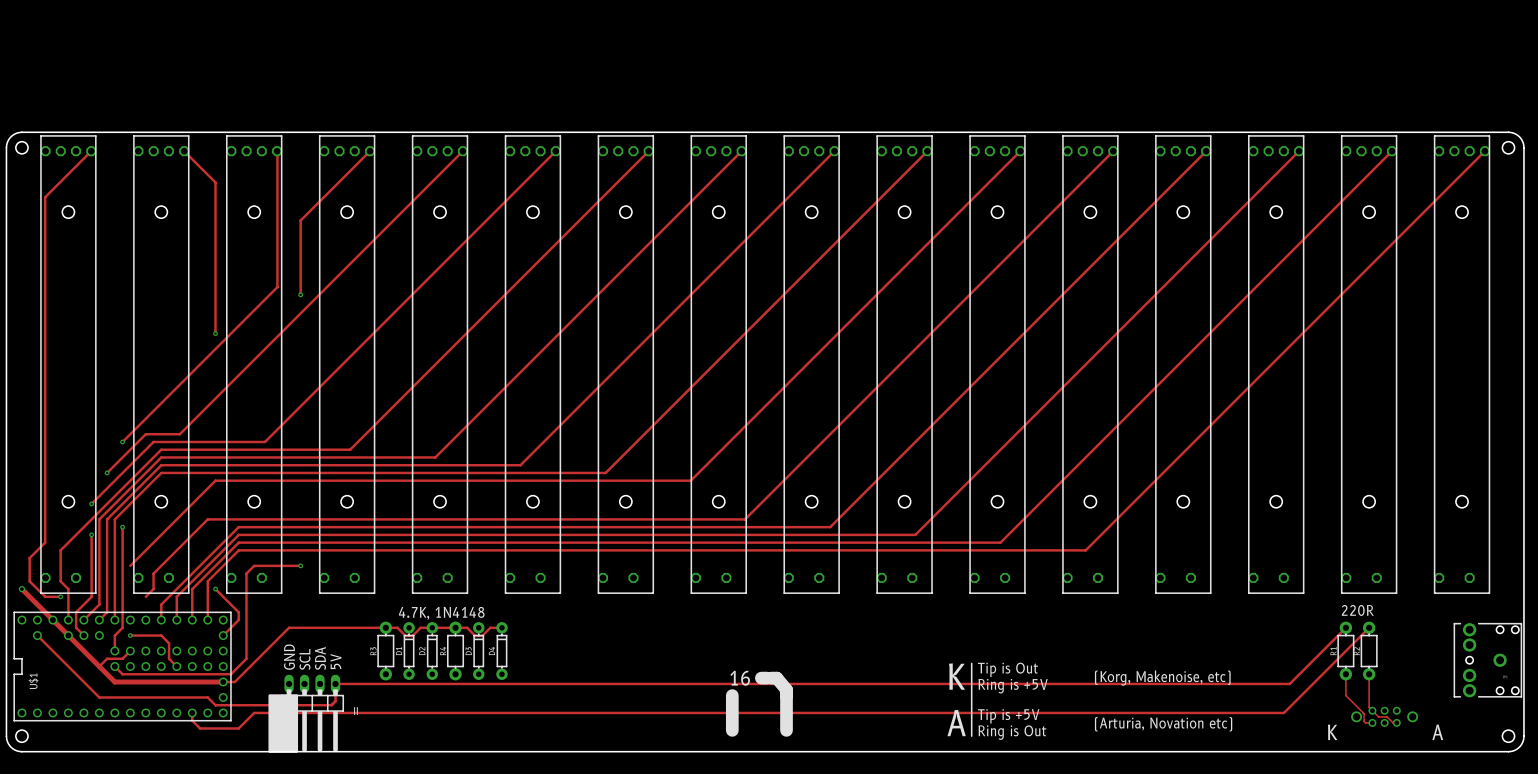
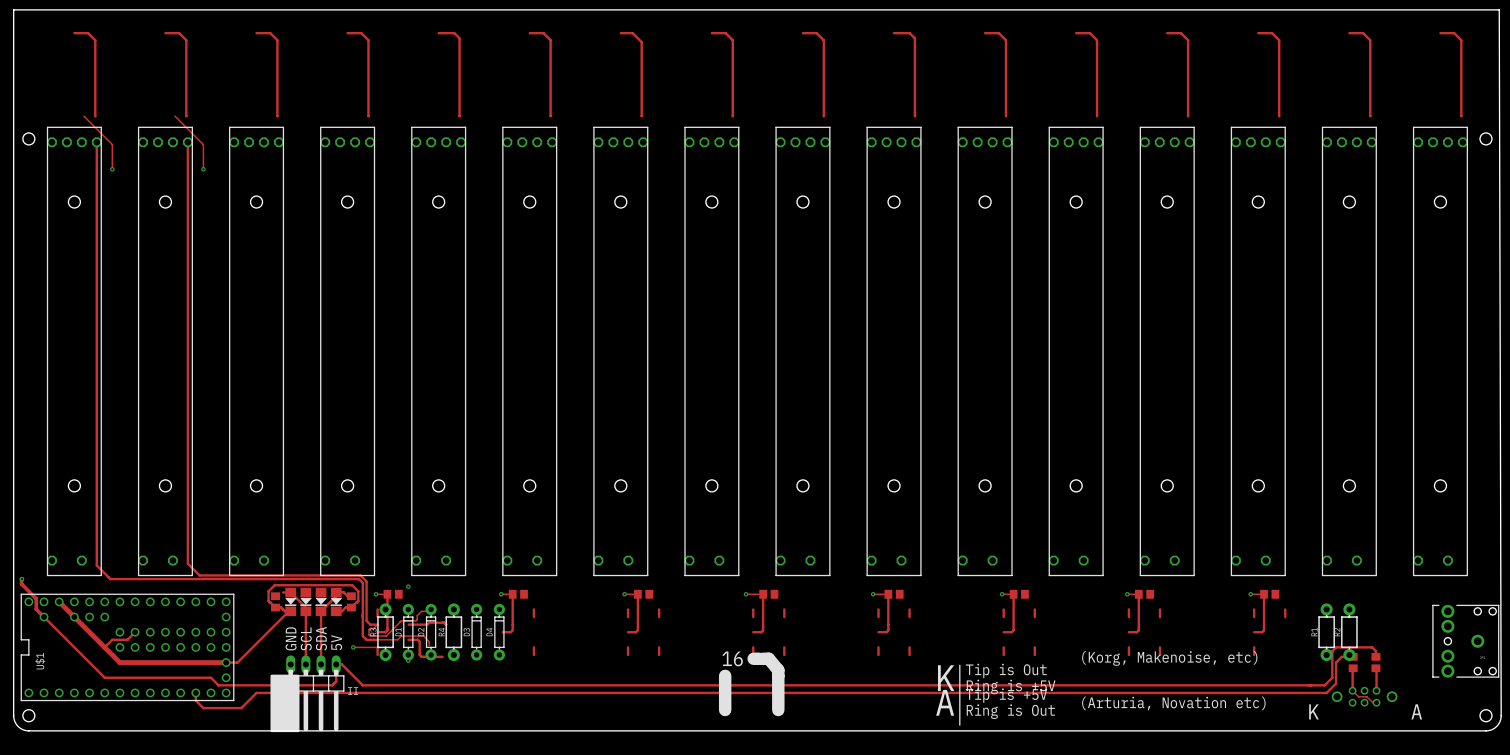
track: none -> (74, 33) (88, 33) (95, 40) (95, 116)
track: none -> (165, 33) (179, 33) (186, 40) (186, 116)
track: none -> (256, 33) (270, 33) (277, 40) (277, 116)
track: none -> (347, 33) (361, 33) (368, 40) (368, 116)
track: none -> (438, 33) (454, 33) (459, 38) (459, 116)
track: none -> (529, 33) (543, 33) (550, 40) (550, 116)
track: none -> (620, 33) (632, 33) (641, 42) (641, 116)
track: none -> (711, 33) (725, 33) (732, 40) (732, 116)
track: none -> (802, 33) (816, 33) (823, 40) (823, 116)
track: none -> (894, 33) (909, 33) (914, 38) (914, 116)
track: none -> (985, 33) (998, 33) (1005, 40) (1005, 116)
track: none -> (1076, 33) (1089, 33) (1097, 40) (1097, 116)
track: none -> (1167, 33) (1181, 33) (1188, 40) (1188, 116)
track: none -> (1258, 33) (1272, 33) (1279, 40) (1279, 116)
track: none -> (1349, 33) (1363, 33) (1370, 40) (1370, 116)
track: none -> (1440, 33) (1454, 33) (1461, 40) (1461, 116)
track: none -> (83, 116) (112, 144) (112, 169)
track: none -> (174, 116) (203, 144) (203, 169)
board edge: (6, 147) (10, 136) (21, 132) (1514, 133) (1520, 138) (1523, 147) (1523, 736) -> (13, 138) (13, 9) (1499, 9) (1501, 715)
track: (91, 151) (45, 197) (45, 542) (29, 558) (29, 581) (45, 596) (60, 596) -> (96, 142) (96, 565) (110, 579) (358, 579) (362, 582) (362, 636) (366, 639) (397, 639) (401, 636) (423, 636) (429, 641) (429, 645)
track: (184, 151) (215, 182) (215, 333) -> (187, 142) (187, 563) (199, 575) (360, 575) (366, 581) (366, 620) (370, 624) (377, 624) (369, 629) (370, 635) (386, 635) (401, 620) (416, 620) (417, 615) (421, 611) (429, 611)
track: (277, 151) (277, 287) (122, 441) -> none
track: (369, 151) (300, 220) (300, 294) -> none
track: (462, 151) (179, 434) (145, 434) (107, 472) -> none
track: (555, 151) (265, 441) (153, 441) (91, 503) -> none
track: (648, 151) (350, 449) (161, 449) (60, 550) (60, 581) (68, 589) (68, 620) -> none
track: (741, 151) (435, 457) (161, 457) (99, 519) (99, 604) (83, 620) -> none
track: (834, 151) (520, 465) (161, 465) (107, 519) (107, 612) (99, 620) -> none
track: (927, 151) (605, 472) (161, 472) (114, 519) (114, 620) -> none
track: (1020, 151) (690, 480) (215, 480) (130, 565) -> none
track: (1113, 151) (745, 519) (207, 519) (153, 573) (153, 589) (145, 596) -> none
track: (1206, 151) (830, 527) (238, 527) (161, 604) (161, 620) -> none
track: (1299, 151) (915, 534) (238, 534) (176, 596) (176, 620) -> none
track: (1391, 151) (1000, 542) (238, 542) (192, 589) (192, 620) -> none
track: (1484, 151) (1085, 550) (238, 550) (207, 581) (207, 620) -> none
via: none -> (112, 169)
via: none -> (203, 169)
via: (300, 294) -> none
via: (215, 333) -> none
via: (122, 441) -> none
via: (107, 472) -> none
via: (91, 503) -> none
track: (122, 527) (122, 627) (114, 635) (114, 651) -> none
via: (122, 527) -> none
track: (91, 534) (91, 596) (76, 612) (76, 627) (83, 635) -> none
via: (91, 534) -> none
track: (300, 565) (254, 565) (246, 573) (246, 658) (230, 674) (122, 674) (114, 666) -> none
via: (300, 565) -> none
track: (21, 589) (52, 620) -> none
via: (21, 589) -> none
track: (215, 589) (238, 612) (238, 620) (223, 635) -> none
via: (215, 589) -> none
track: none -> (22, 579) (21, 584) (36, 598) (36, 609) (44, 617)
via: none -> (22, 579)
via: (60, 596) -> none
via: none -> (408, 586)
track: none -> (283, 592) (290, 592) (305, 607) (305, 664)
track: none -> (336, 592) (343, 592) (347, 596) (351, 596)
track: none -> (336, 592) (336, 596) (321, 611) (321, 664)
text: 220R (1357, 610) -> none
track: none -> (376, 594) (387, 594) (387, 630) (385, 632) (377, 632)
via: none -> (376, 594)
part: none -> (393, 594)
track: none -> (501, 594) (512, 594) (512, 630) (510, 632) (502, 632)
via: none -> (501, 594)
part: none -> (518, 594)
track: none -> (624, 594) (637, 594) (637, 630) (636, 632) (628, 632)
via: none -> (624, 594)
part: none -> (643, 594)
track: none -> (746, 594) (763, 594) (763, 630) (761, 632) (753, 632)
via: none -> (746, 594)
part: none -> (768, 594)
track: none -> (873, 594) (888, 594) (888, 630) (886, 632) (878, 632)
via: none -> (873, 594)
part: none -> (894, 594)
track: none -> (1002, 594) (1013, 594) (1013, 630) (1011, 632) (1003, 632)
via: none -> (1002, 594)
part: none -> (1019, 594)
track: none -> (1127, 594) (1138, 594) (1138, 630) (1136, 632) (1128, 632)
via: none -> (1127, 594)
part: none -> (1144, 594)
track: none -> (1250, 594) (1264, 594) (1264, 630) (1262, 632) (1254, 632)
via: none -> (1250, 594)
part: none -> (1269, 594)
text: 4.7K, 1N4148 (441, 613) -> none
part: none -> (275, 601)
part: none -> (290, 601)
part: none -> (305, 601)
part: none -> (321, 601)
part: none -> (336, 601)
part: none -> (351, 601)
track: (289, 627) (397, 627) (405, 636) (412, 636) (420, 627) (467, 627) (475, 636) (482, 636) (490, 627) (501, 627) -> none
track: none -> (377, 609) (377, 617)
track: none -> (533, 609) (533, 617)
track: none -> (628, 609) (628, 617)
track: none -> (659, 609) (659, 617)
track: none -> (753, 609) (753, 617)
track: none -> (784, 609) (784, 617)
track: none -> (878, 609) (878, 617)
track: none -> (909, 609) (909, 617)
track: none -> (1003, 609) (1003, 617)
track: none -> (1034, 609) (1034, 617)
track: none -> (1128, 609) (1128, 617)
track: none -> (1160, 609) (1160, 617)
track: none -> (1254, 609) (1254, 617)
track: none -> (1285, 609) (1285, 617)
track: (1345, 627) (1289, 683) (341, 683) -> (1375, 656) (1375, 651) (1372, 647) (1336, 647) (1332, 651) (1332, 677) (1324, 685) (362, 685) (341, 664)
track: (1369, 627) (1283, 712) -> (1353, 656) (1341, 656) (1336, 662) (1336, 683) (1326, 692) (1265, 692)
track: none -> (290, 611) (275, 607) (268, 601) (268, 591) (274, 585) (352, 585) (358, 591) (358, 601) (351, 607) (336, 611)
track: (130, 635) (161, 635) (169, 643) (169, 658) (176, 666) -> none
via: (130, 635) -> none
track: none -> (408, 624) (427, 624) (429, 622) (444, 622) (446, 624)
track: none -> (408, 639) (417, 639) (419, 641) (419, 654) (421, 656) (442, 656)
line: (971, 663) (971, 684) -> none
track: none -> (353, 647) (377, 647) (377, 654)
via: none -> (353, 647)
track: none -> (533, 647) (533, 654)
track: none -> (628, 647) (628, 654)
track: none -> (659, 647) (659, 654)
track: none -> (753, 647) (753, 654)
track: none -> (784, 647) (784, 654)
track: none -> (878, 647) (878, 654)
track: none -> (909, 647) (909, 654)
track: none -> (1003, 647) (1003, 654)
track: none -> (1034, 647) (1034, 654)
track: none -> (1128, 647) (1128, 654)
track: none -> (1160, 647) (1160, 654)
track: none -> (1254, 647) (1254, 654)
text position: Tip is Out (1007, 669) -> Tip is Out (1006, 670)
track: (1345, 674) (1345, 695) (1364, 713) (1364, 721) (1372, 722) -> none
track: (1369, 674) (1369, 707) (1372, 710) -> (1353, 668) (1352, 690)
text position: K (957, 676) -> K (946, 678)
via: none -> (408, 660)
part: none -> (1353, 662)
part: none -> (1375, 662)
text position: Ring is +5V (1013, 686) -> Ring is +5V (1011, 686)
track: none -> (1375, 668) (1376, 690)
line: none -> (959, 715) (959, 725)

